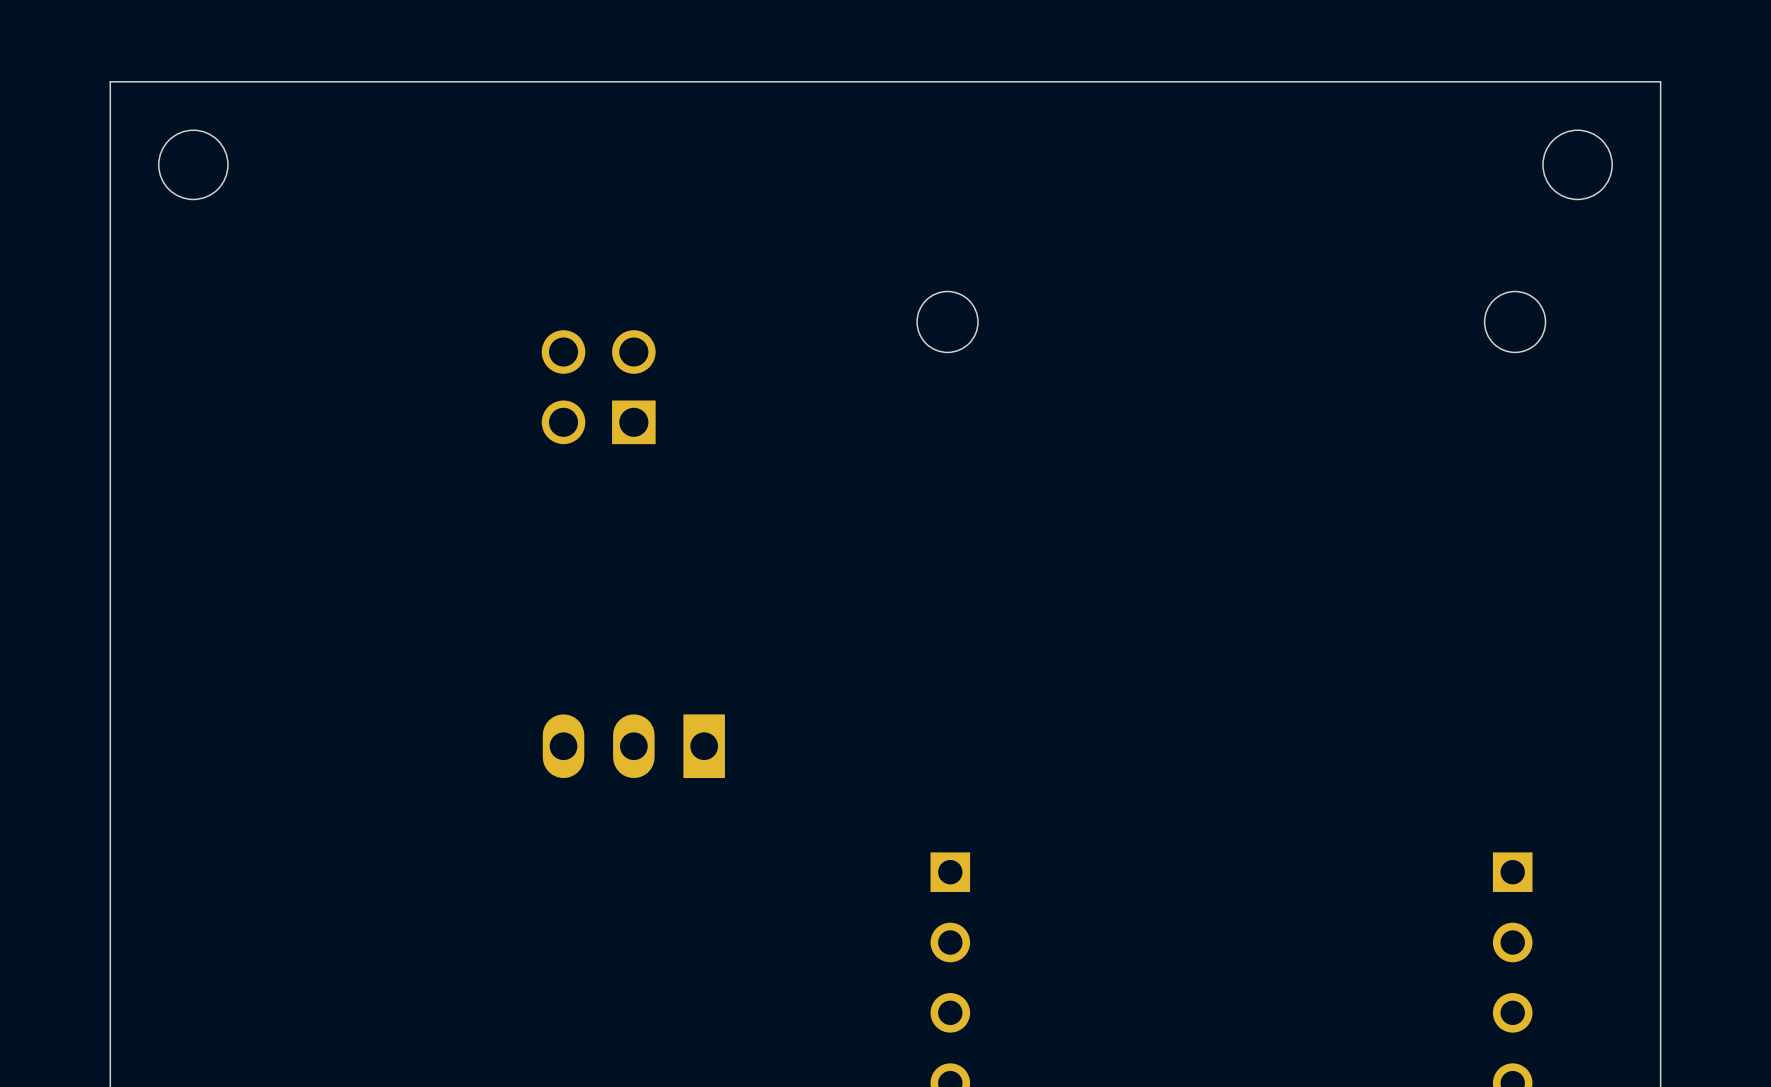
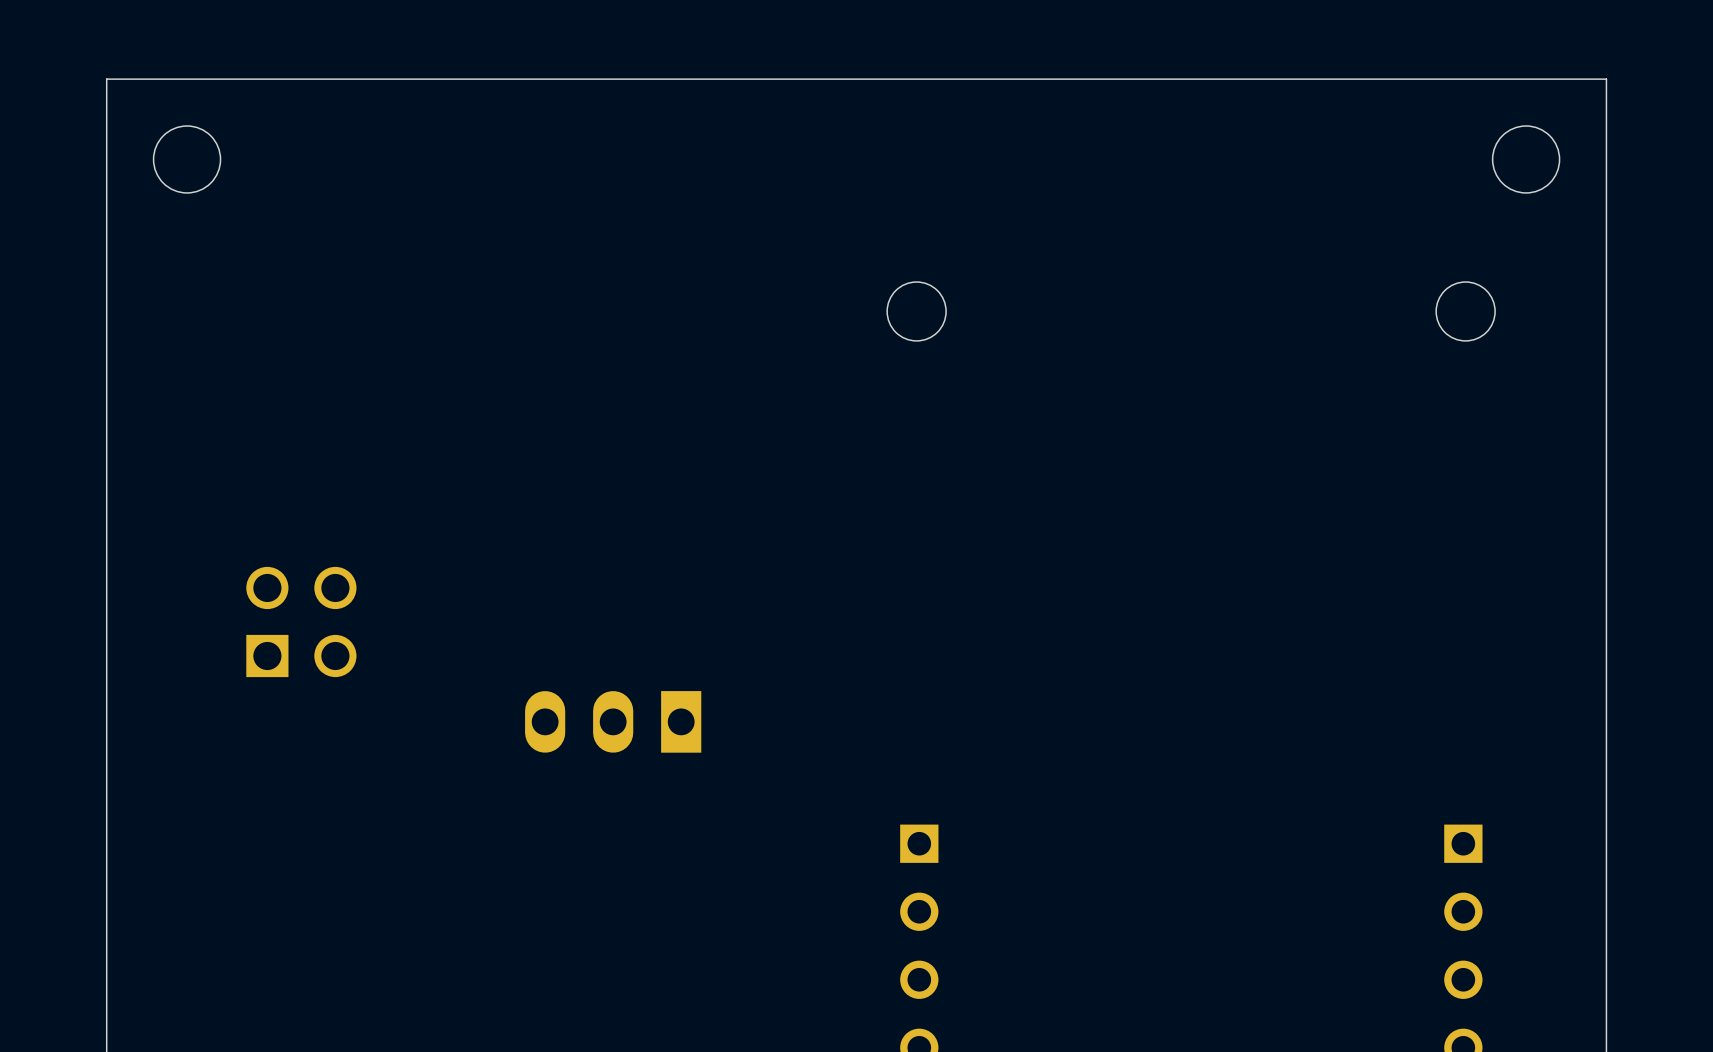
part rotation: 0° (598, 387) -> 90° clockwise (301, 621)
part position: (598, 387) -> (301, 621)

